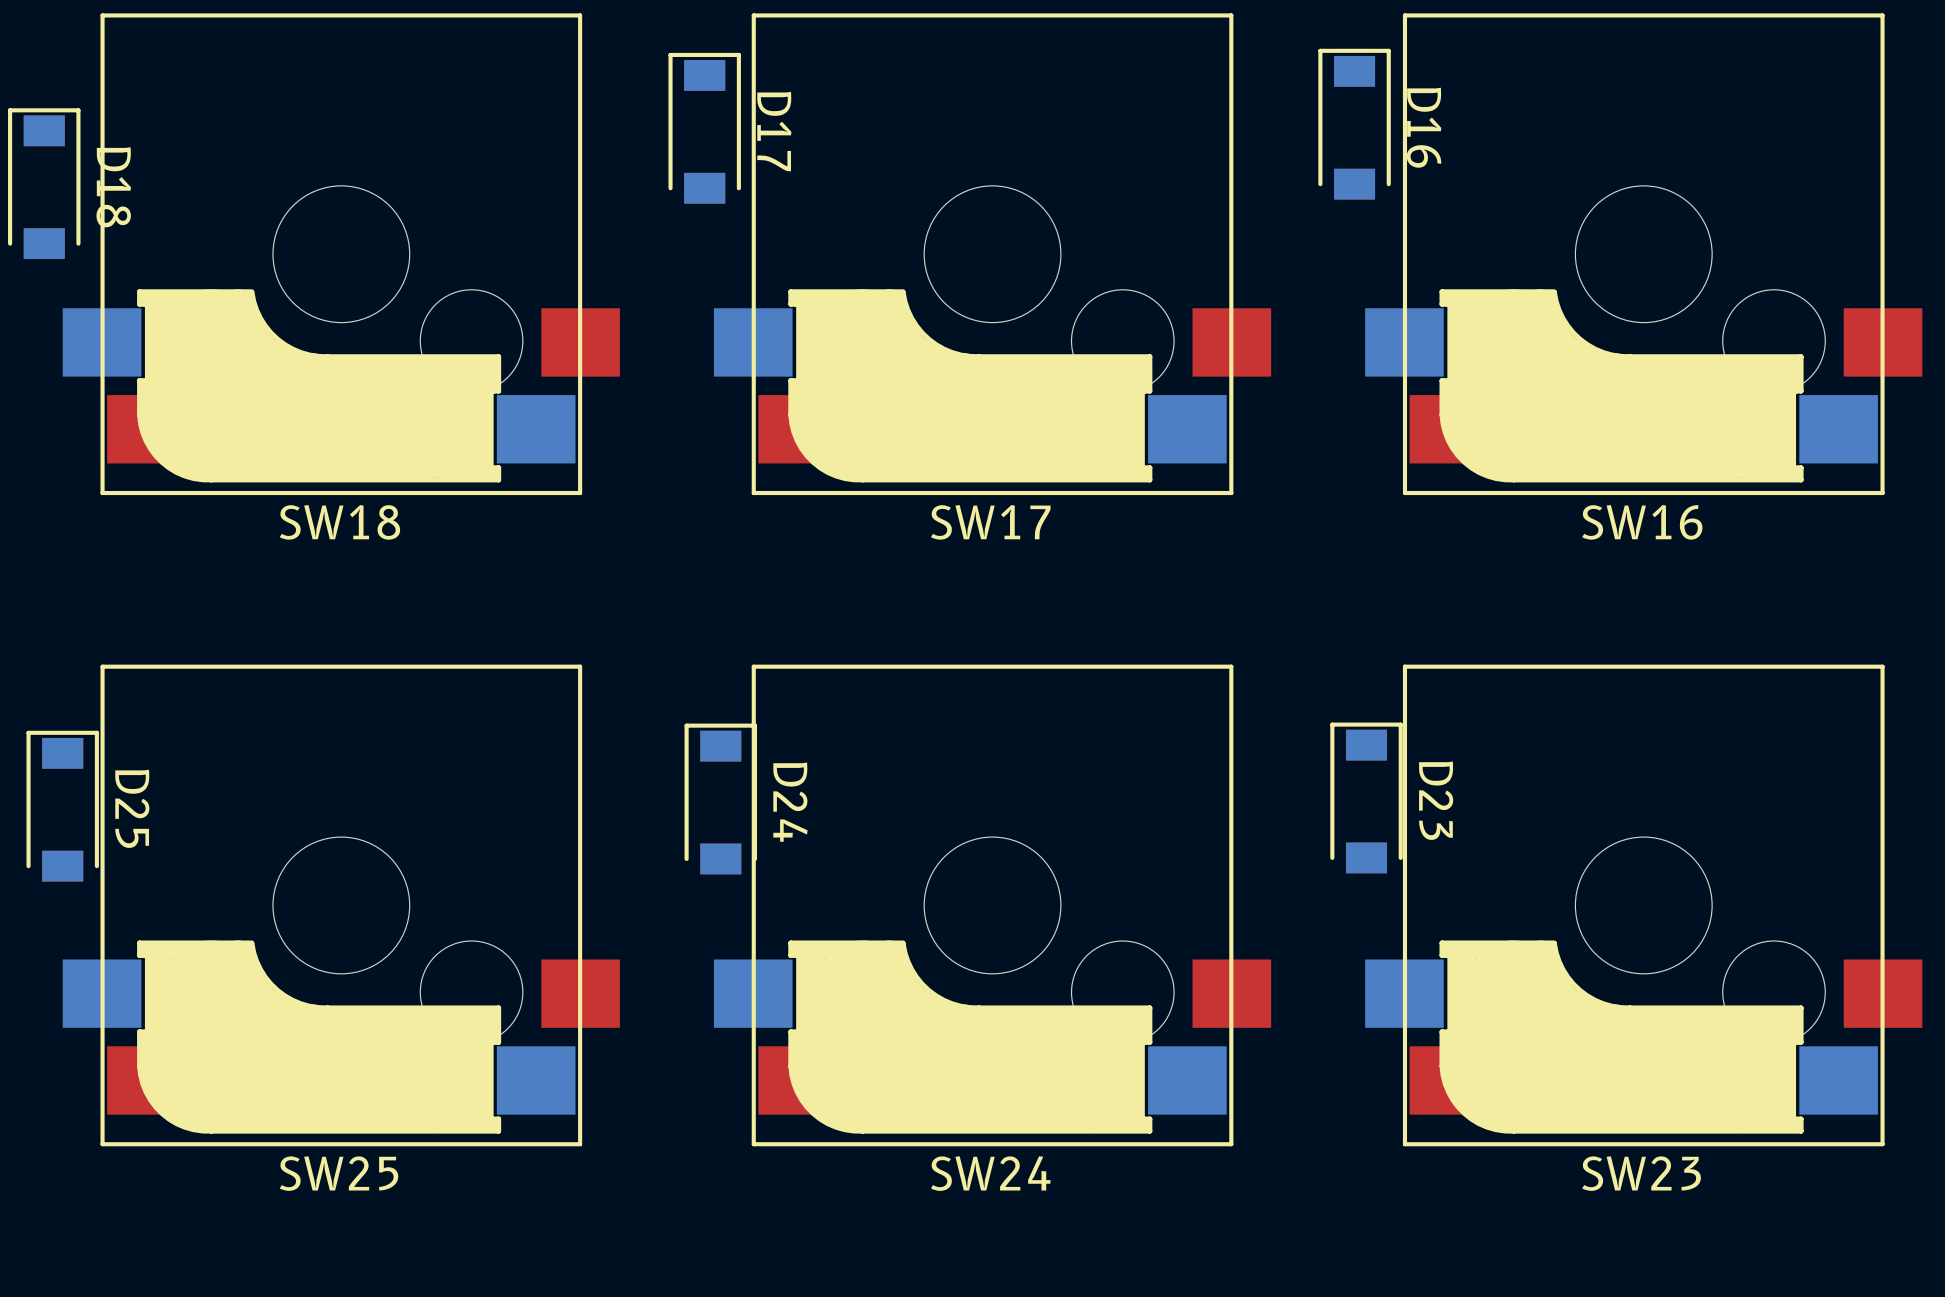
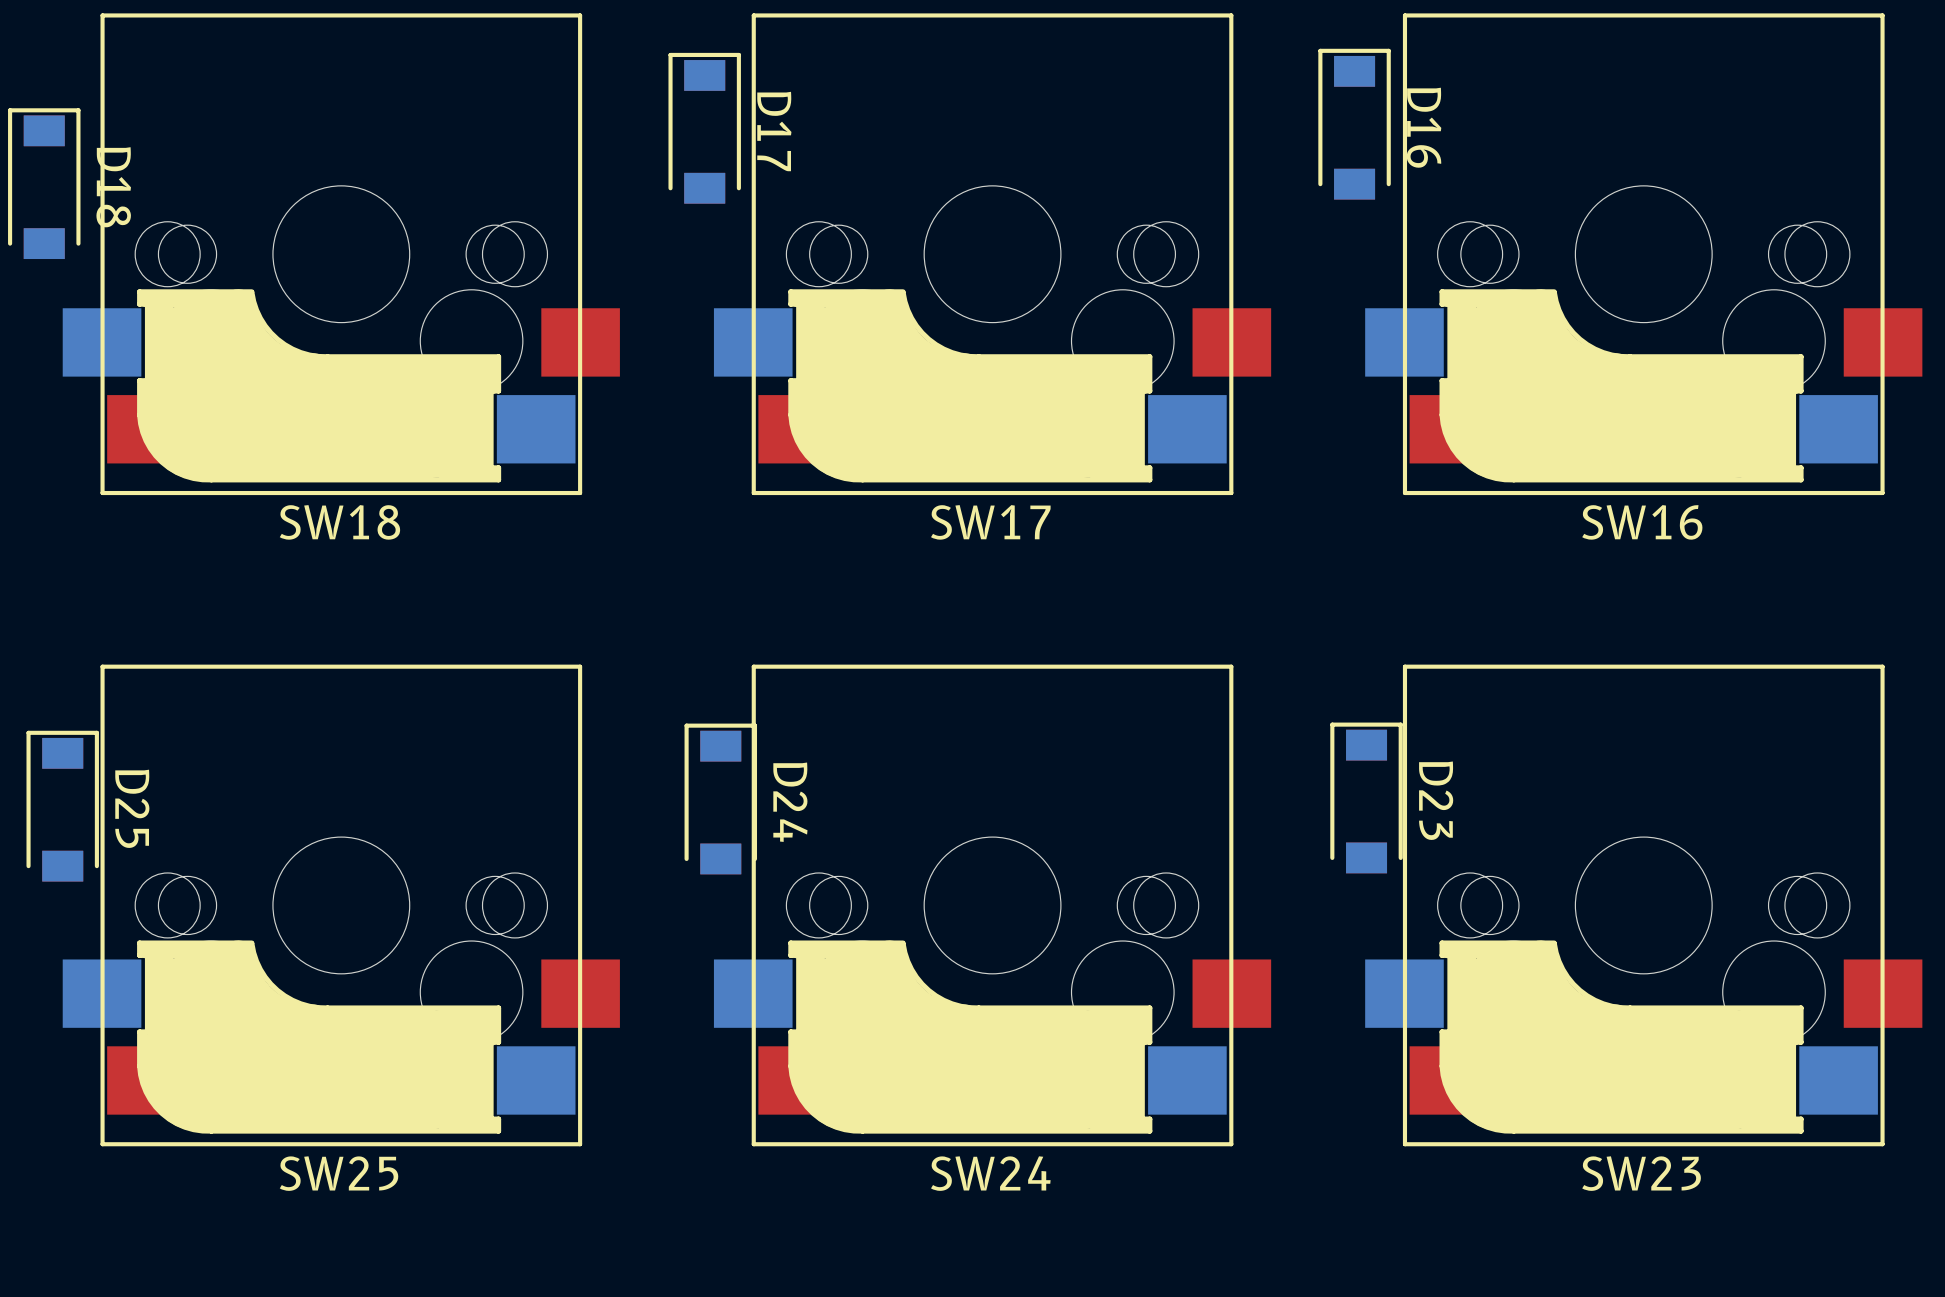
SW18 footprint: [62, 13, 620, 496] -> [62, 13, 620, 496]
SW17 footprint: [713, 13, 1272, 496] -> [713, 13, 1272, 496]
SW16 footprint: [1365, 13, 1923, 496] -> [1365, 13, 1923, 496]
SW25 footprint: [62, 664, 620, 1147] -> [62, 664, 620, 1147]
SW24 footprint: [713, 664, 1272, 1147] -> [713, 664, 1272, 1147]
SW23 footprint: [1365, 664, 1923, 1147] -> [1365, 664, 1923, 1147]

